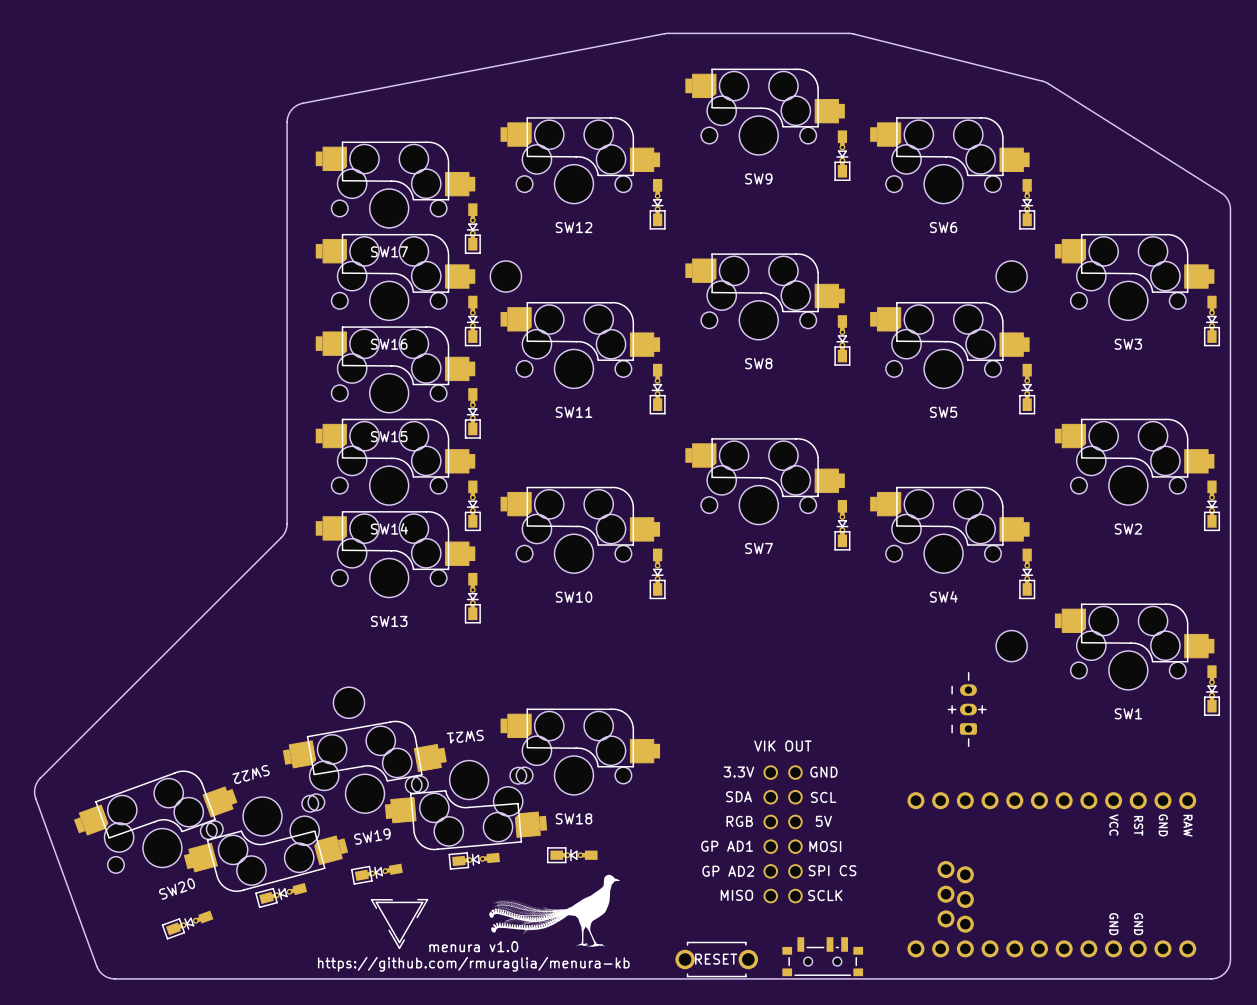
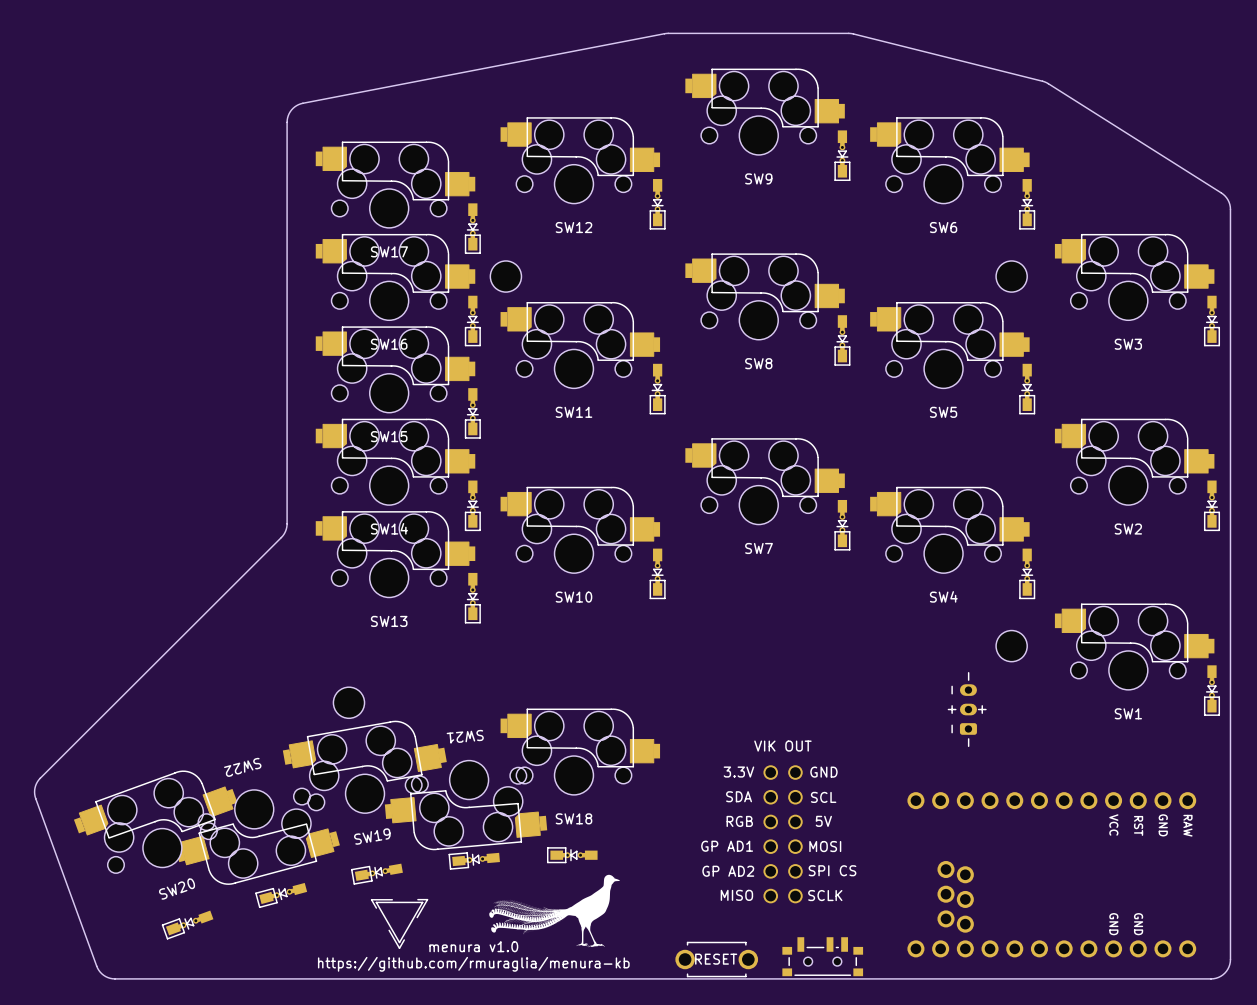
SW22 footprint: [183, 795, 349, 892] -> [175, 788, 340, 885]

